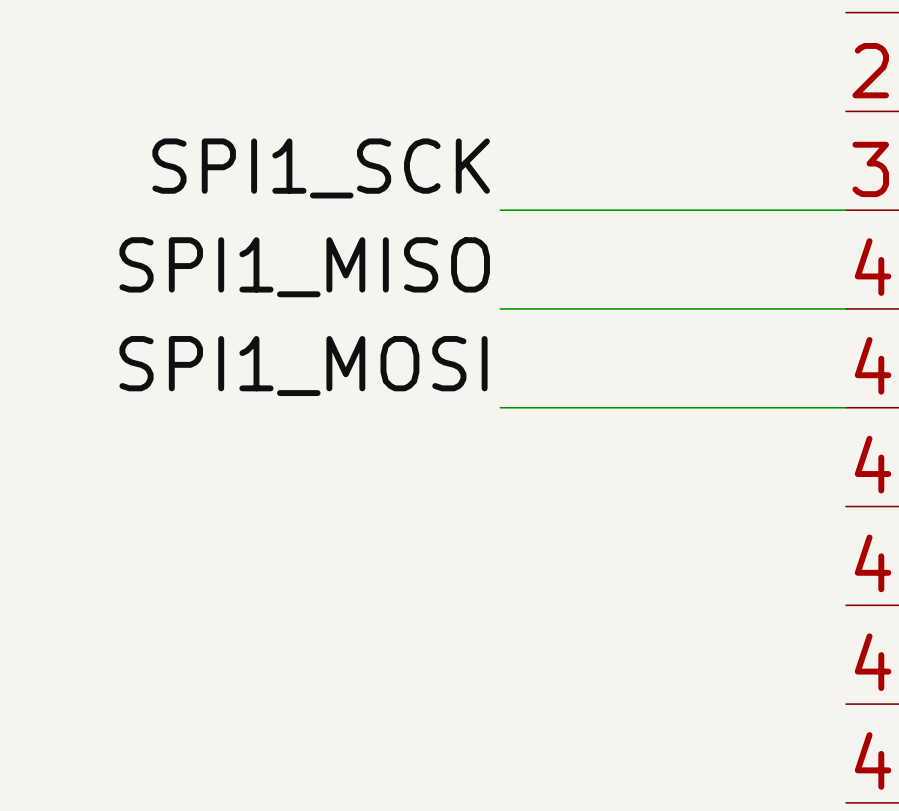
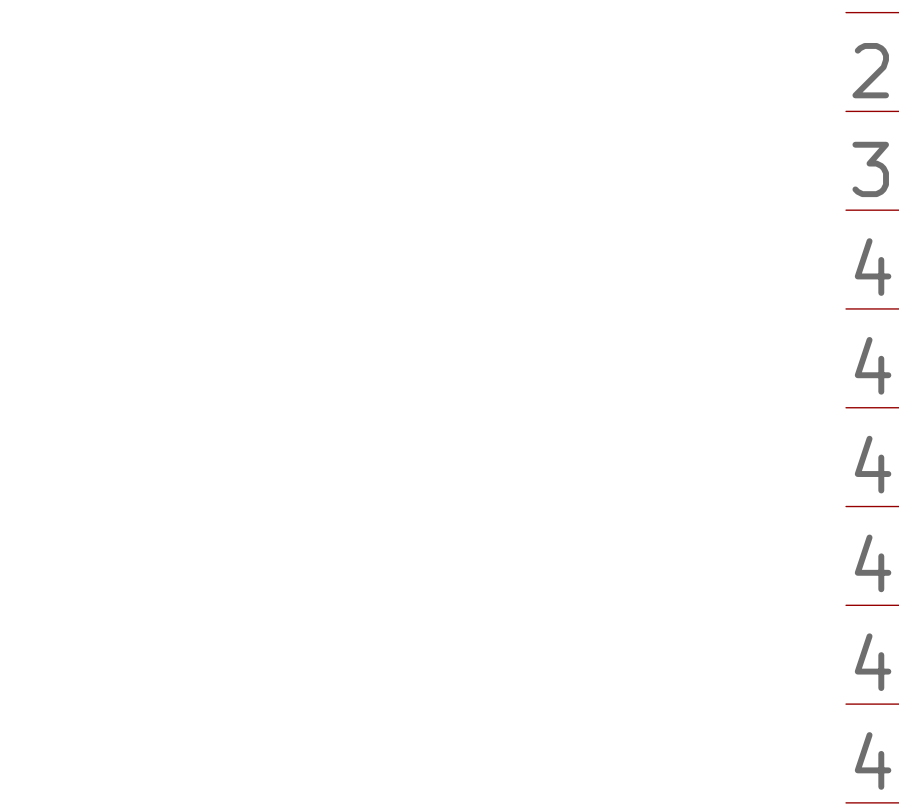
label: SPI1_SCK (321, 168) -> none
wire: (500, 210) (846, 210) -> none
label: SPI1_MISO (304, 267) -> none
wire: (500, 308) (846, 308) -> none
label: SPI1_MOSI (303, 366) -> none
wire: (500, 407) (846, 407) -> none

